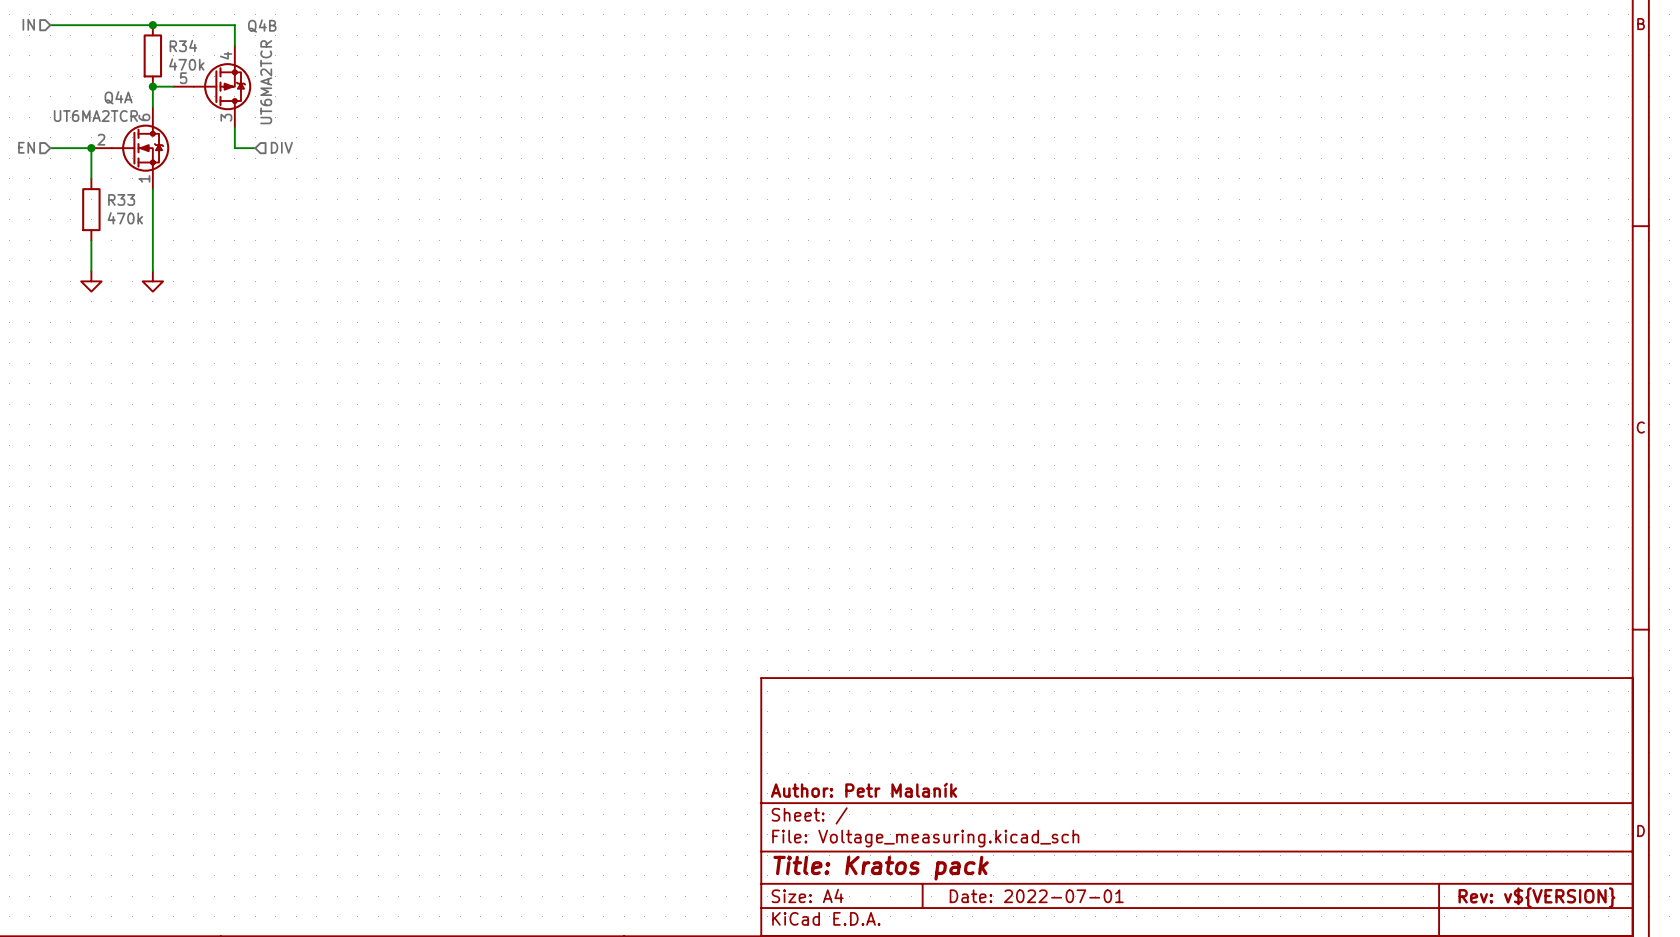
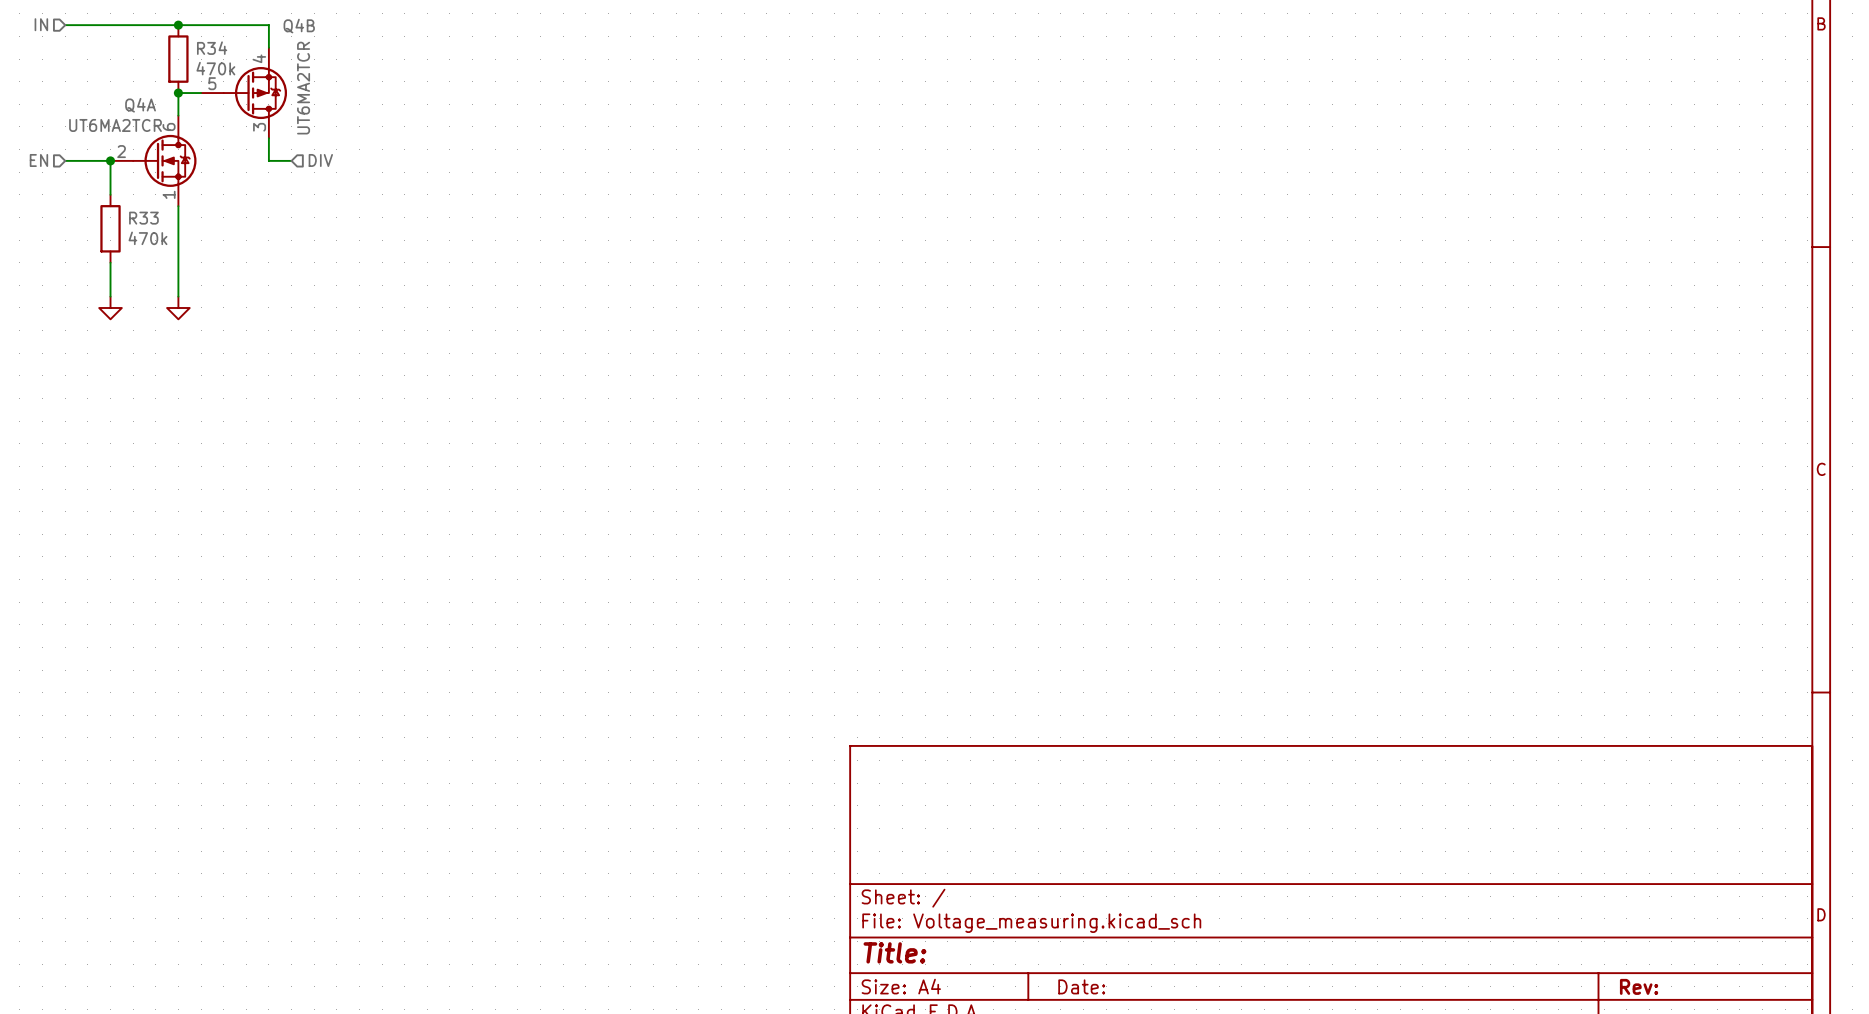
title block: Author: Petr Malaník (864, 790) -> none
title block: Title: Kratos pack (881, 868) -> Title: (894, 952)
title block: Date: 2022-07-01 (1036, 896) -> Date: (1081, 986)
title block: Rev: v${VERSION} (1536, 897) -> Rev: (1639, 986)

